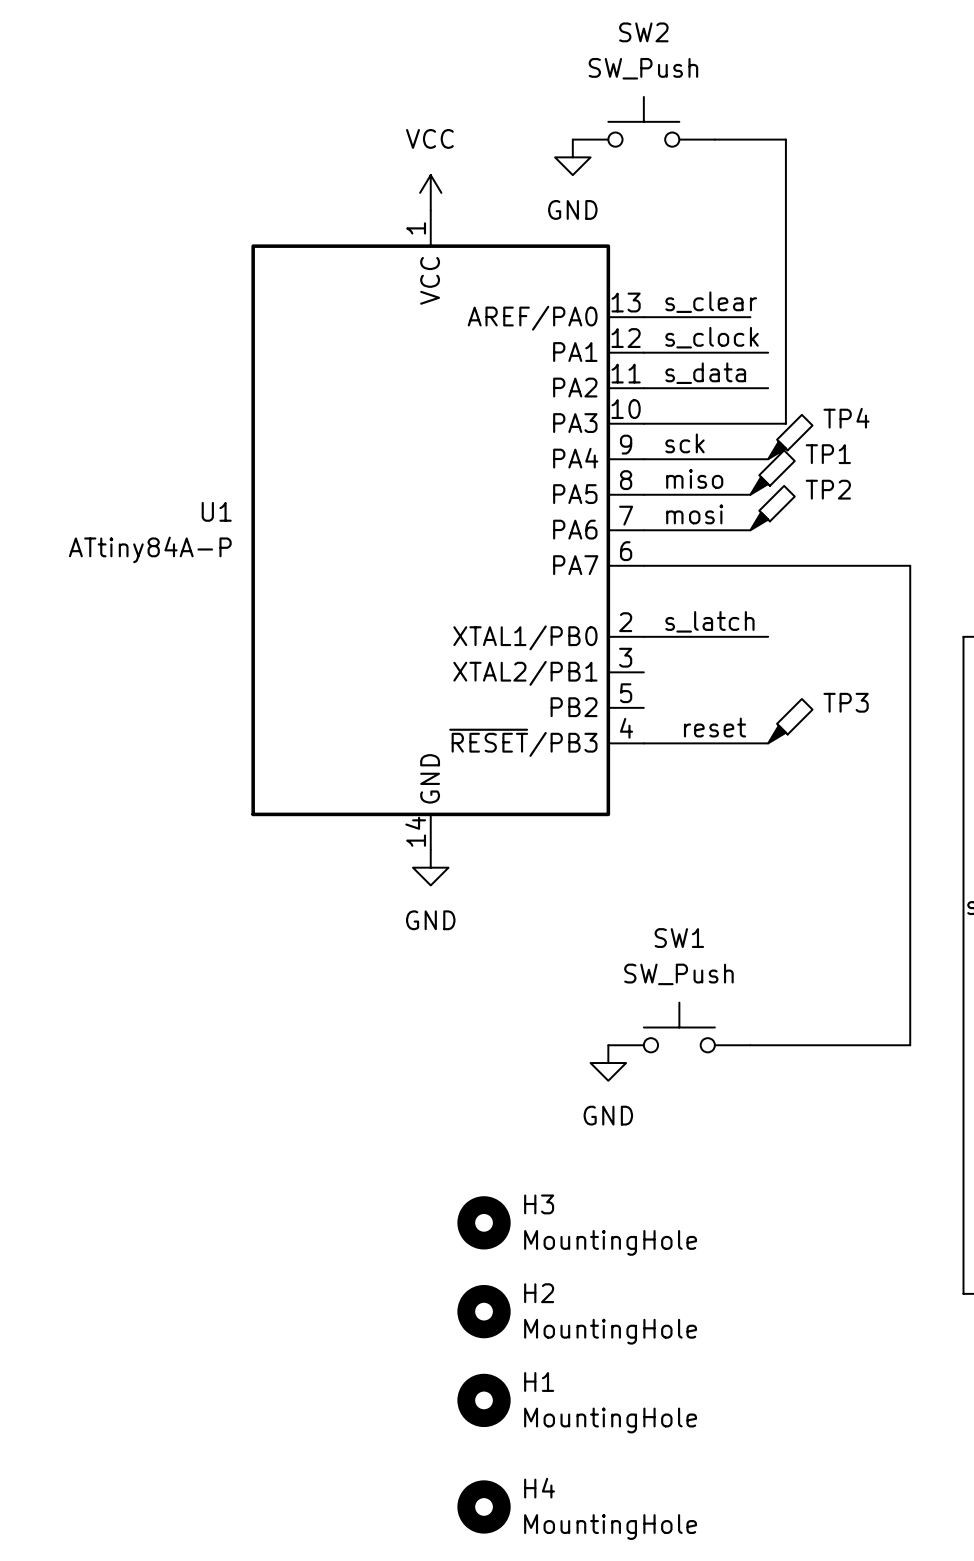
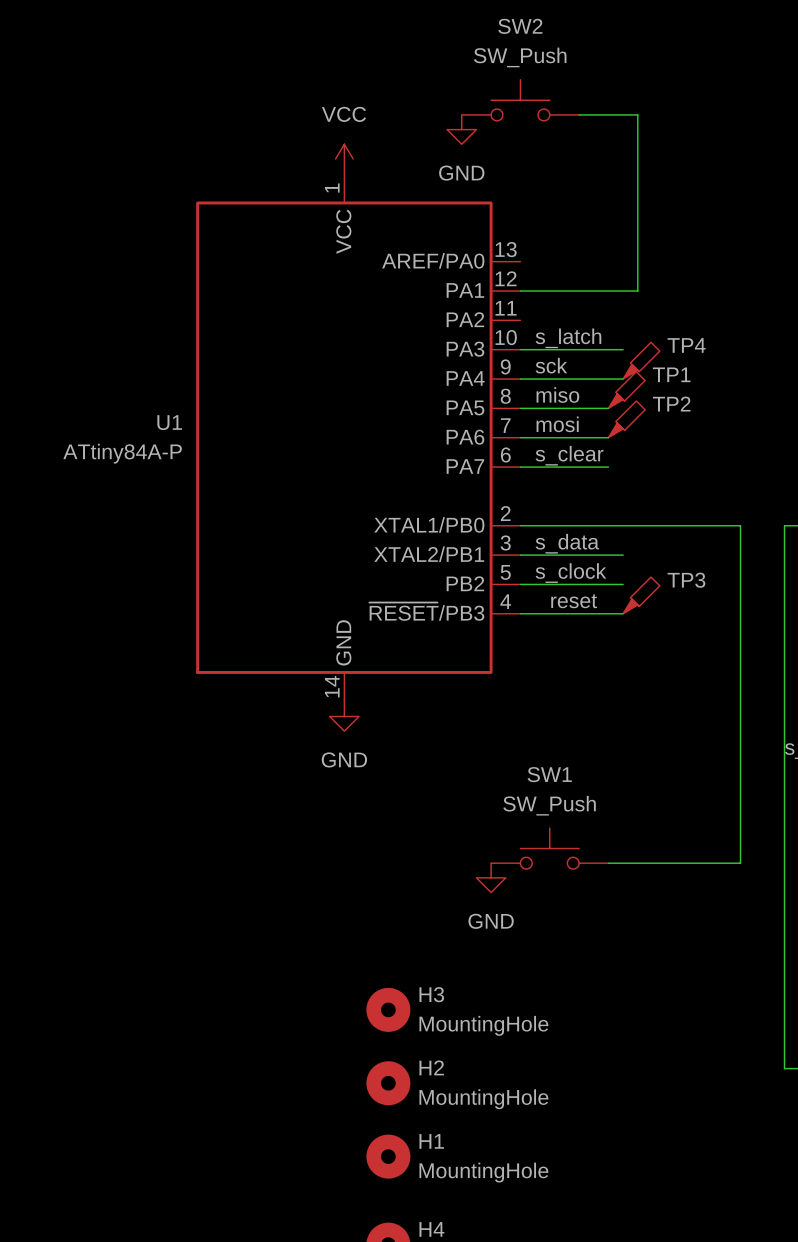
label position: s_clear (711, 302) -> s_clear (569, 455)
wire: (643, 317) (750, 317) -> none
label: s_clock (712, 337) -> none
wire: (785, 352) (785, 423) (768, 423) -> (637, 291) (623, 291)
label position: s_data (705, 373) -> s_data (567, 543)
wire: (643, 388) (768, 388) -> (520, 555) (623, 555)
wire: (750, 565) (910, 565) (910, 636) -> (623, 525) (740, 525)
label position: s_latch (709, 621) -> s_latch (568, 338)
label: none -> s_clock (570, 573)
wire: none -> (520, 584) (623, 584)

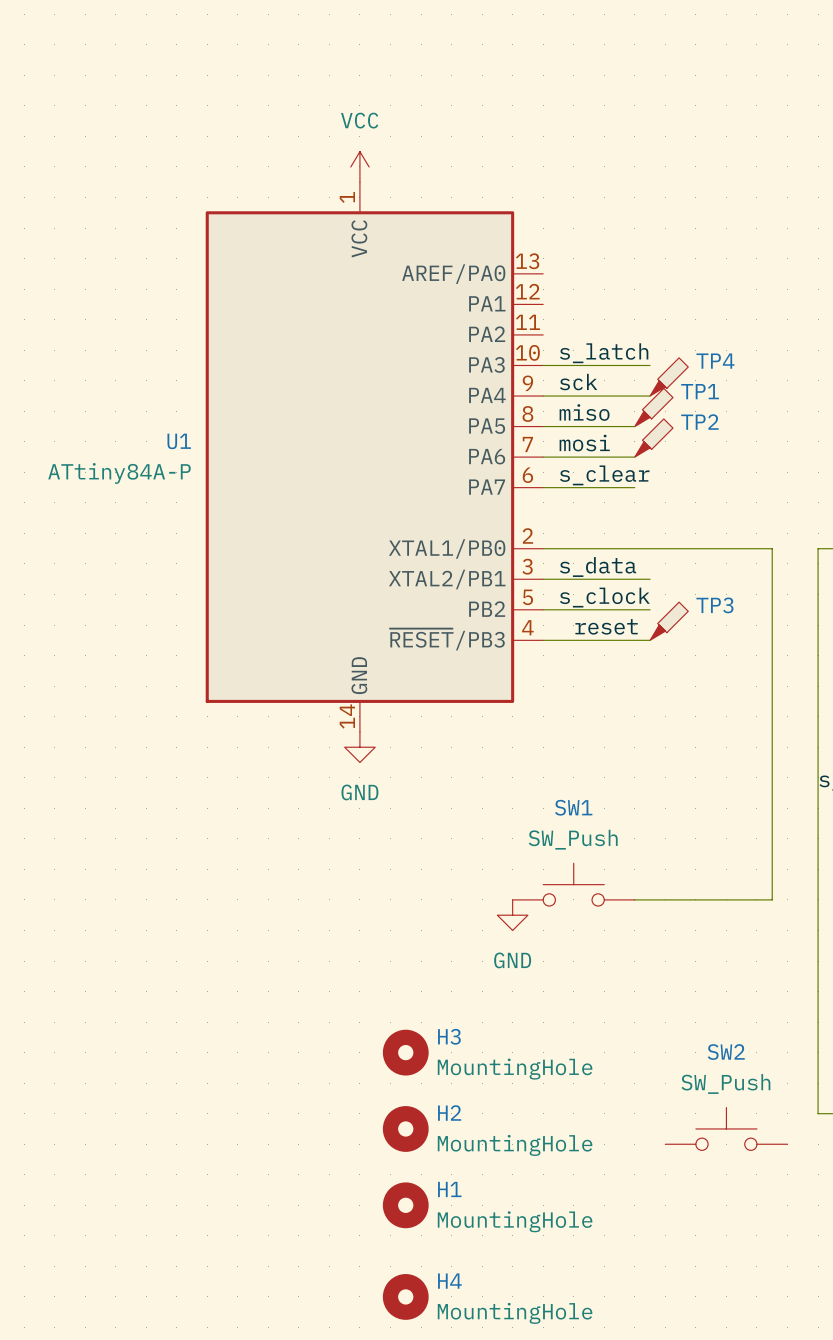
SW2 position: (520, 100) -> (726, 1128)
wire: (579, 114) (637, 114) (637, 291) (520, 291) -> none
power symbol: GND (461, 129) -> none

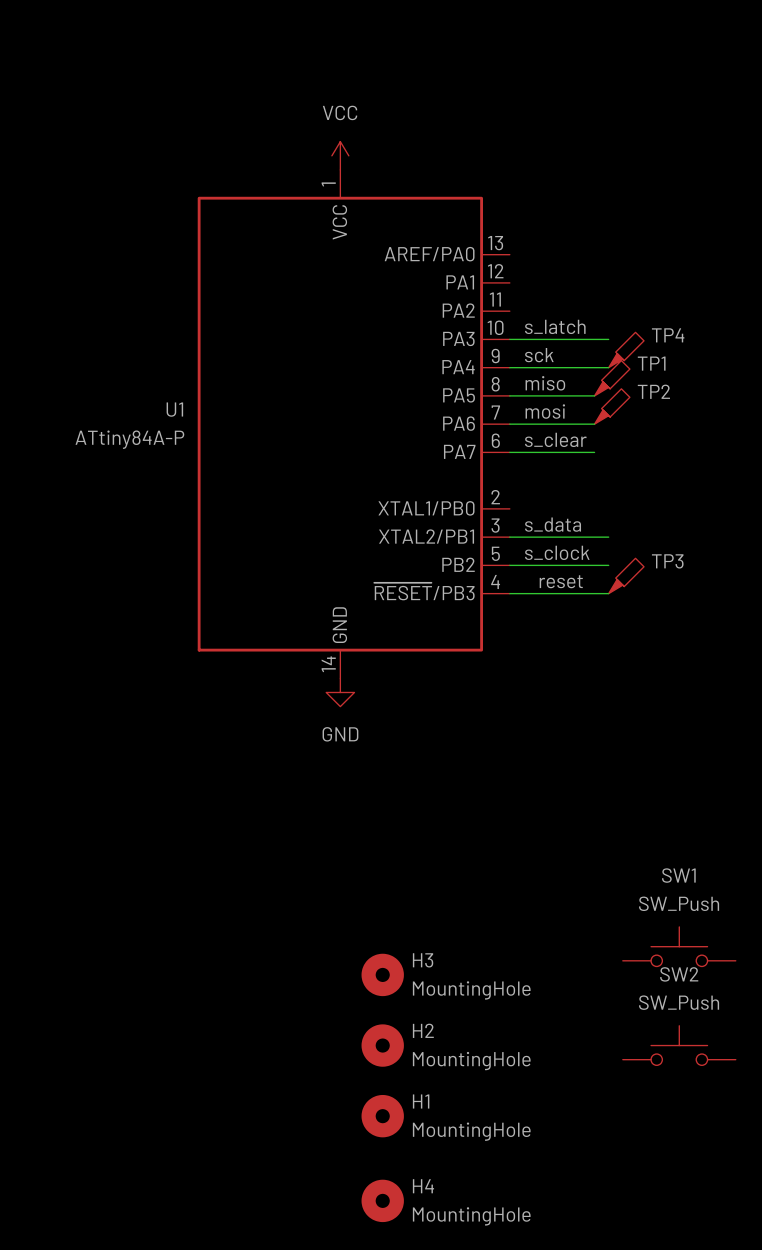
wire: (543, 548) (772, 548) (772, 899) (634, 899) -> none
SW1 position: (573, 884) -> (679, 946)
power symbol: GND (512, 915) -> none

